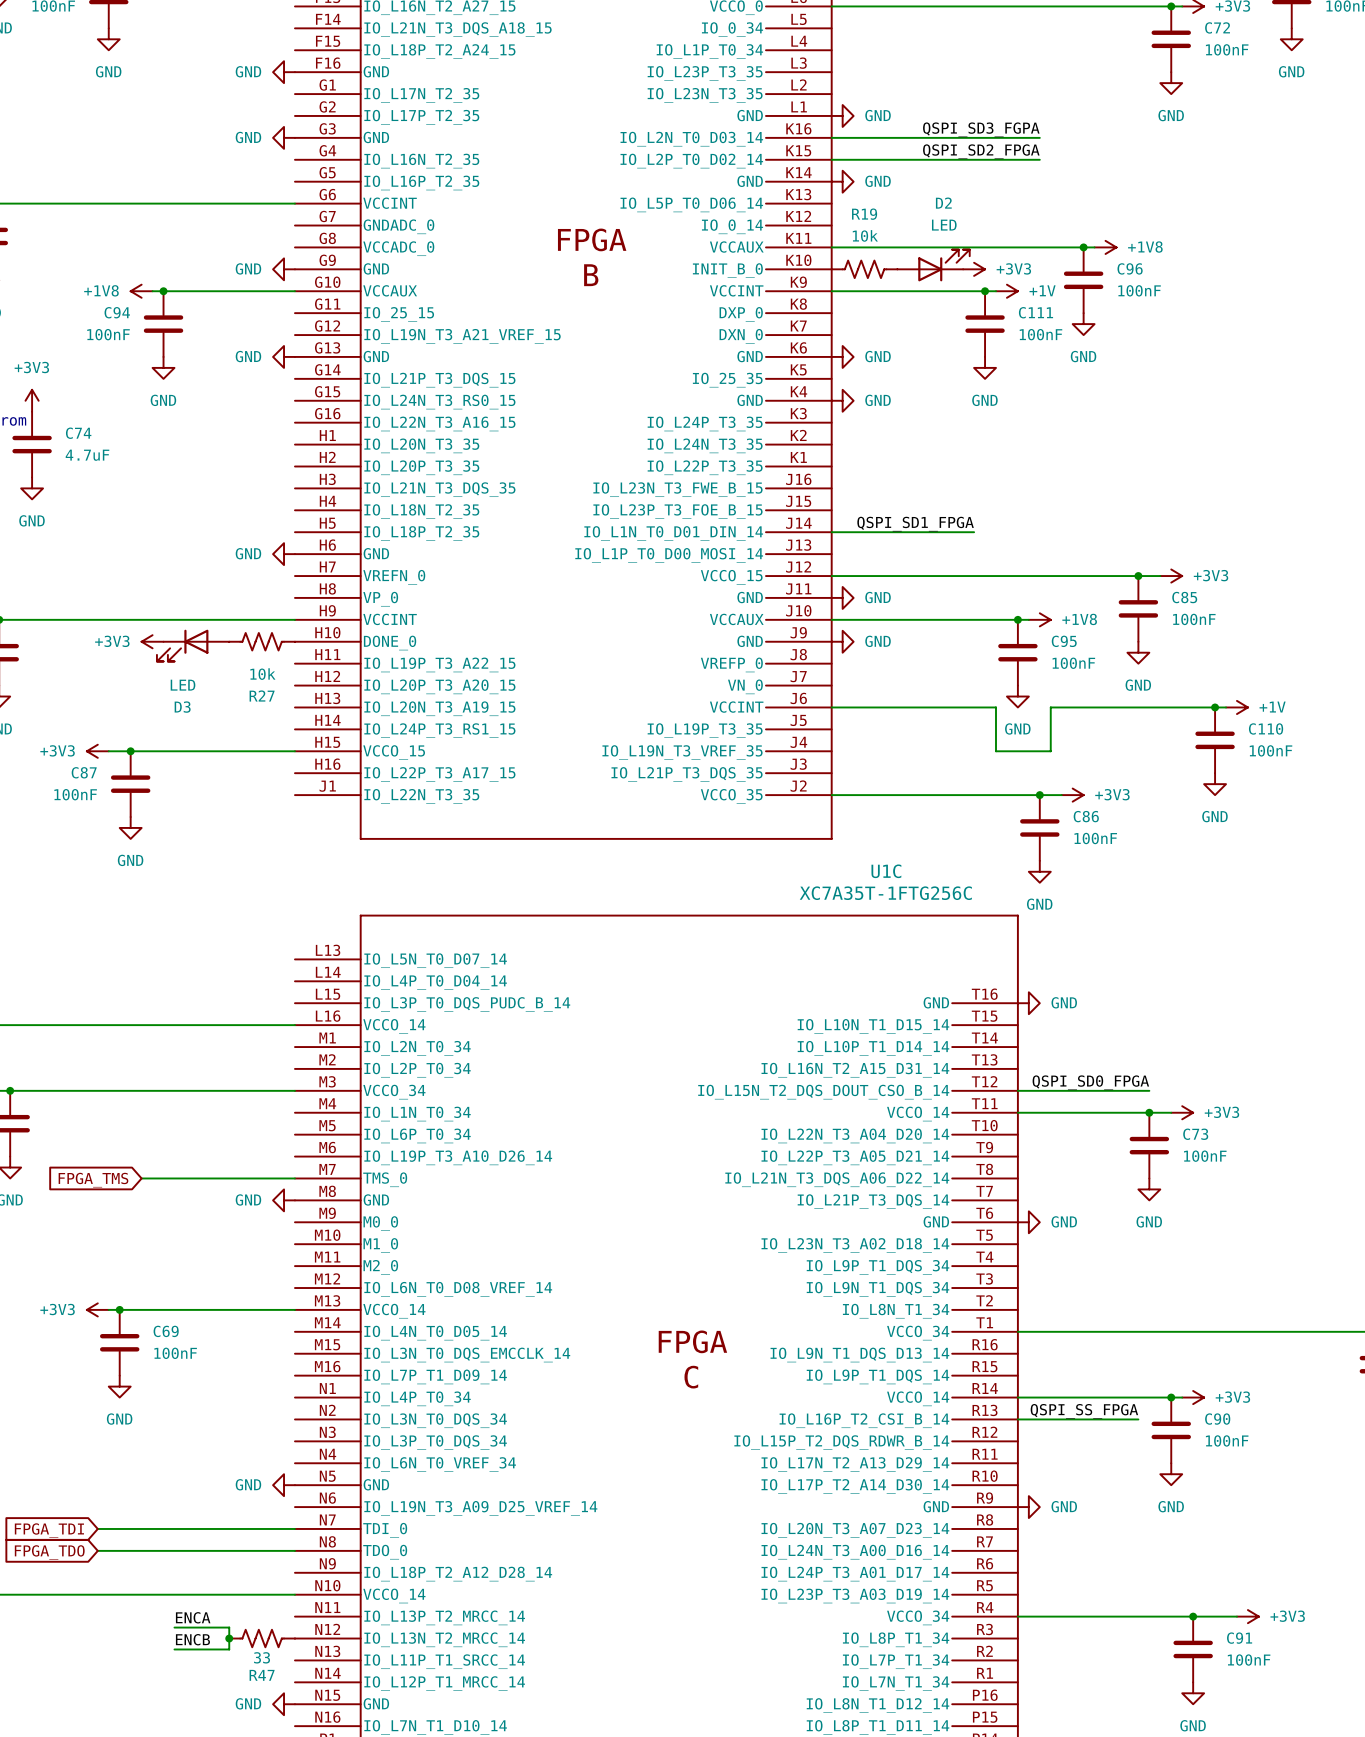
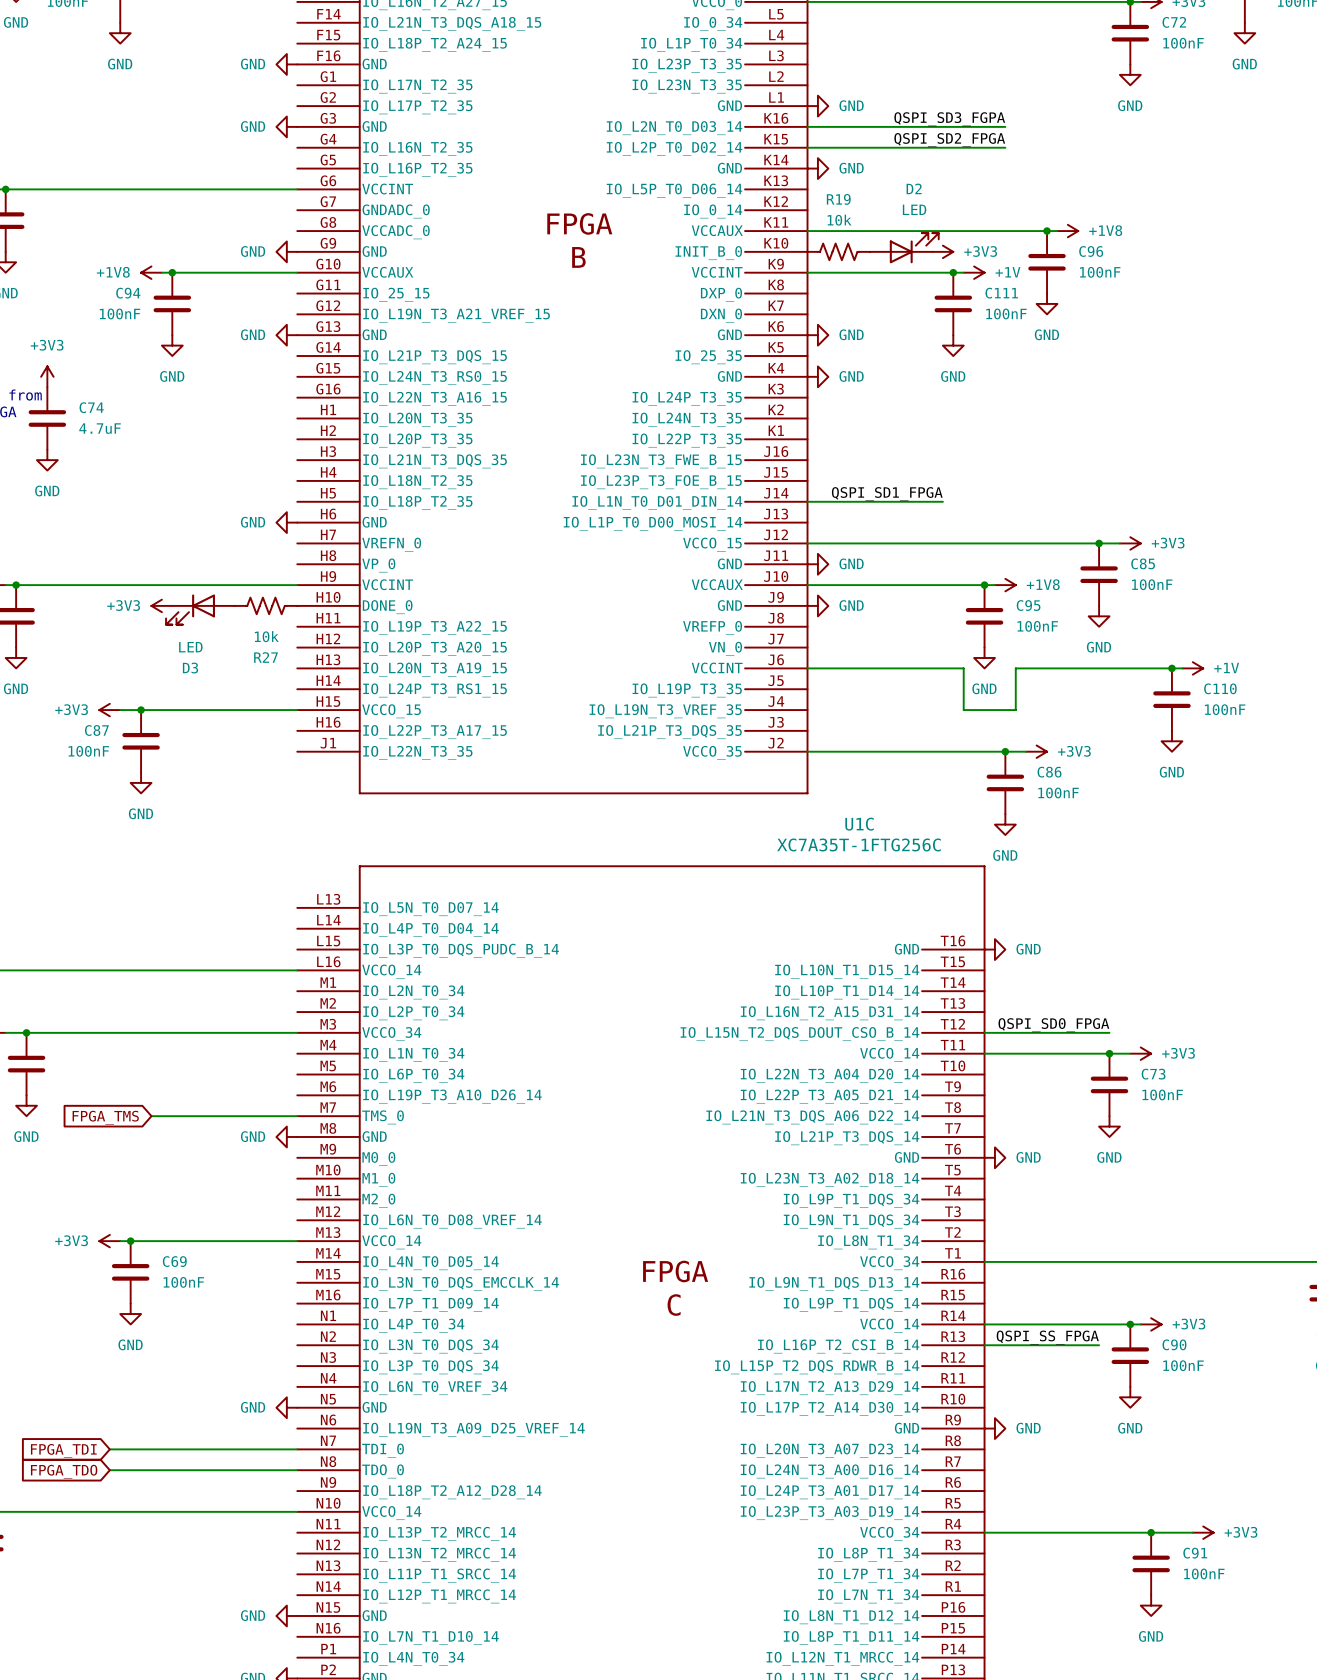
label: ENCA (193, 1617) -> none
wire: (174, 1627) (229, 1627) (229, 1649) (174, 1649) -> none
junction: (229, 1638) -> none
R47: 33 (262, 1638) -> none
label: ENCB (192, 1639) -> none

